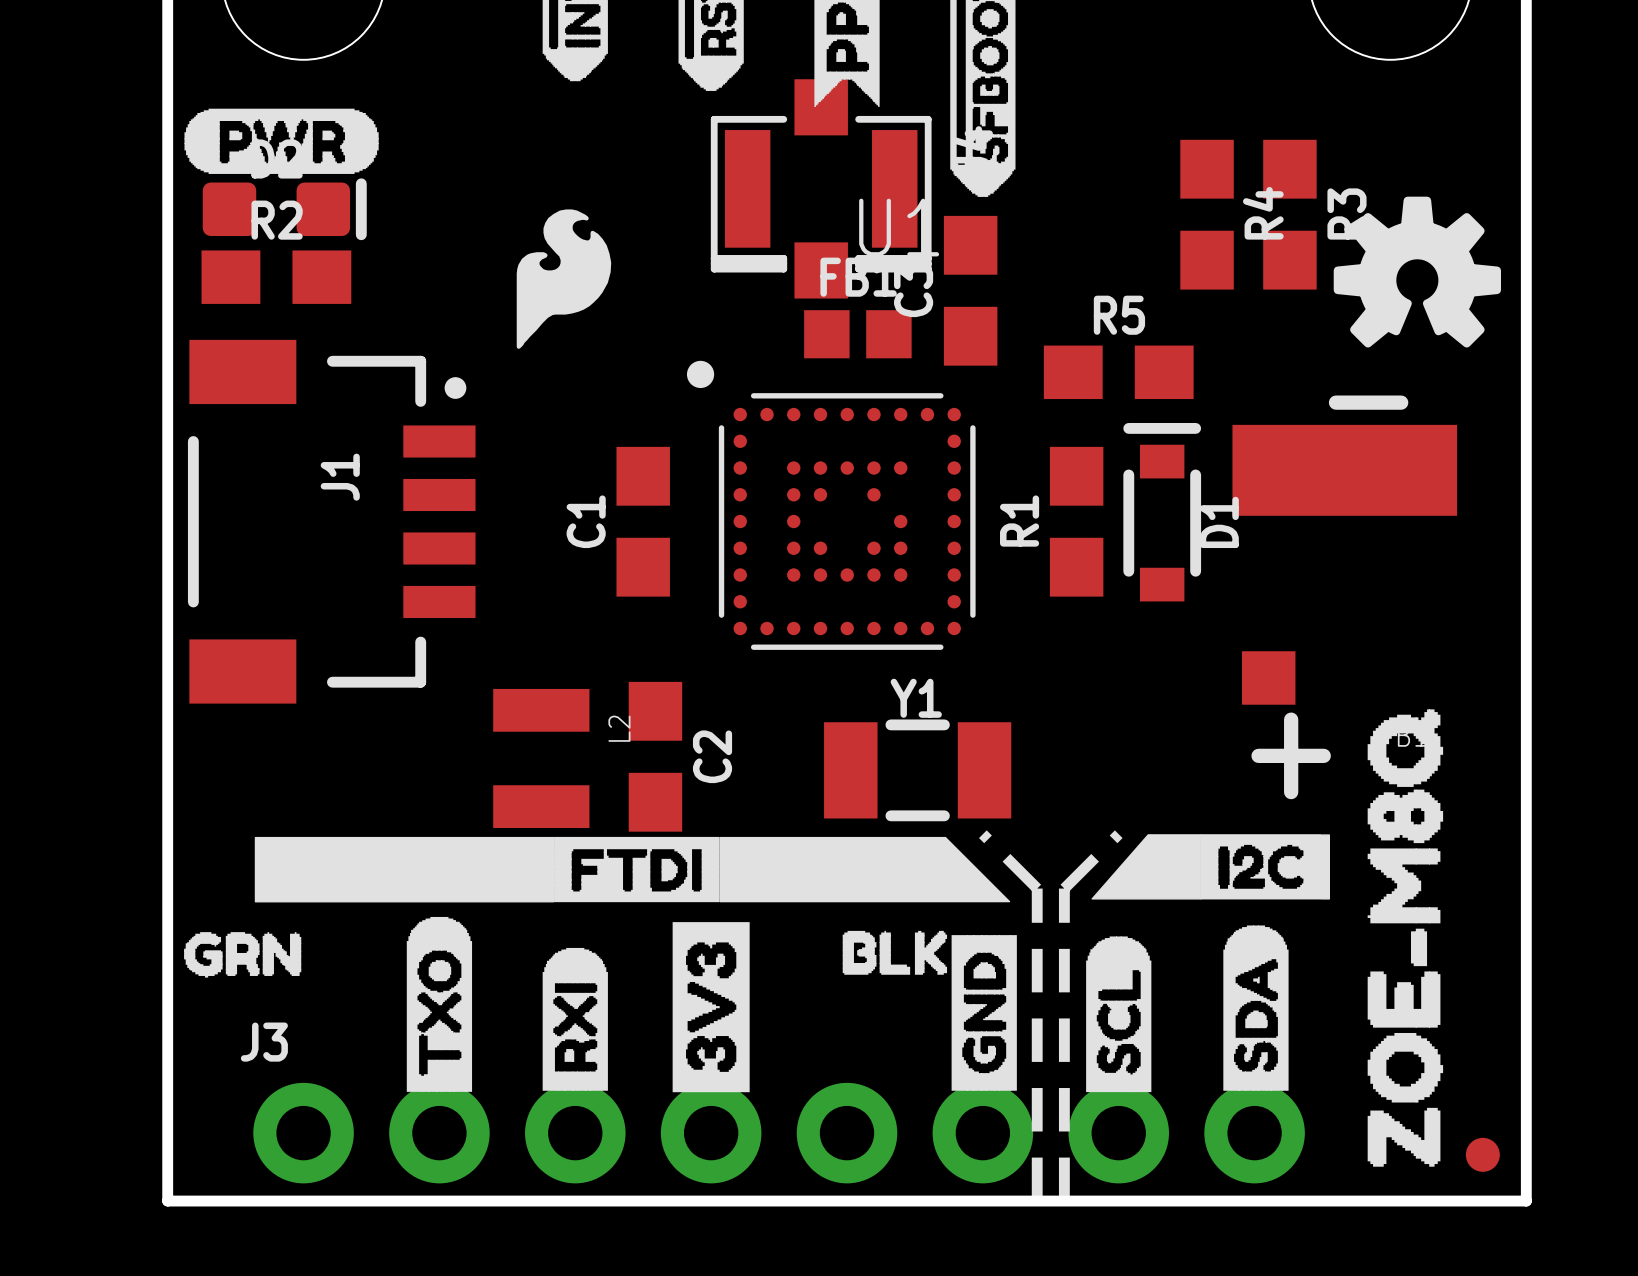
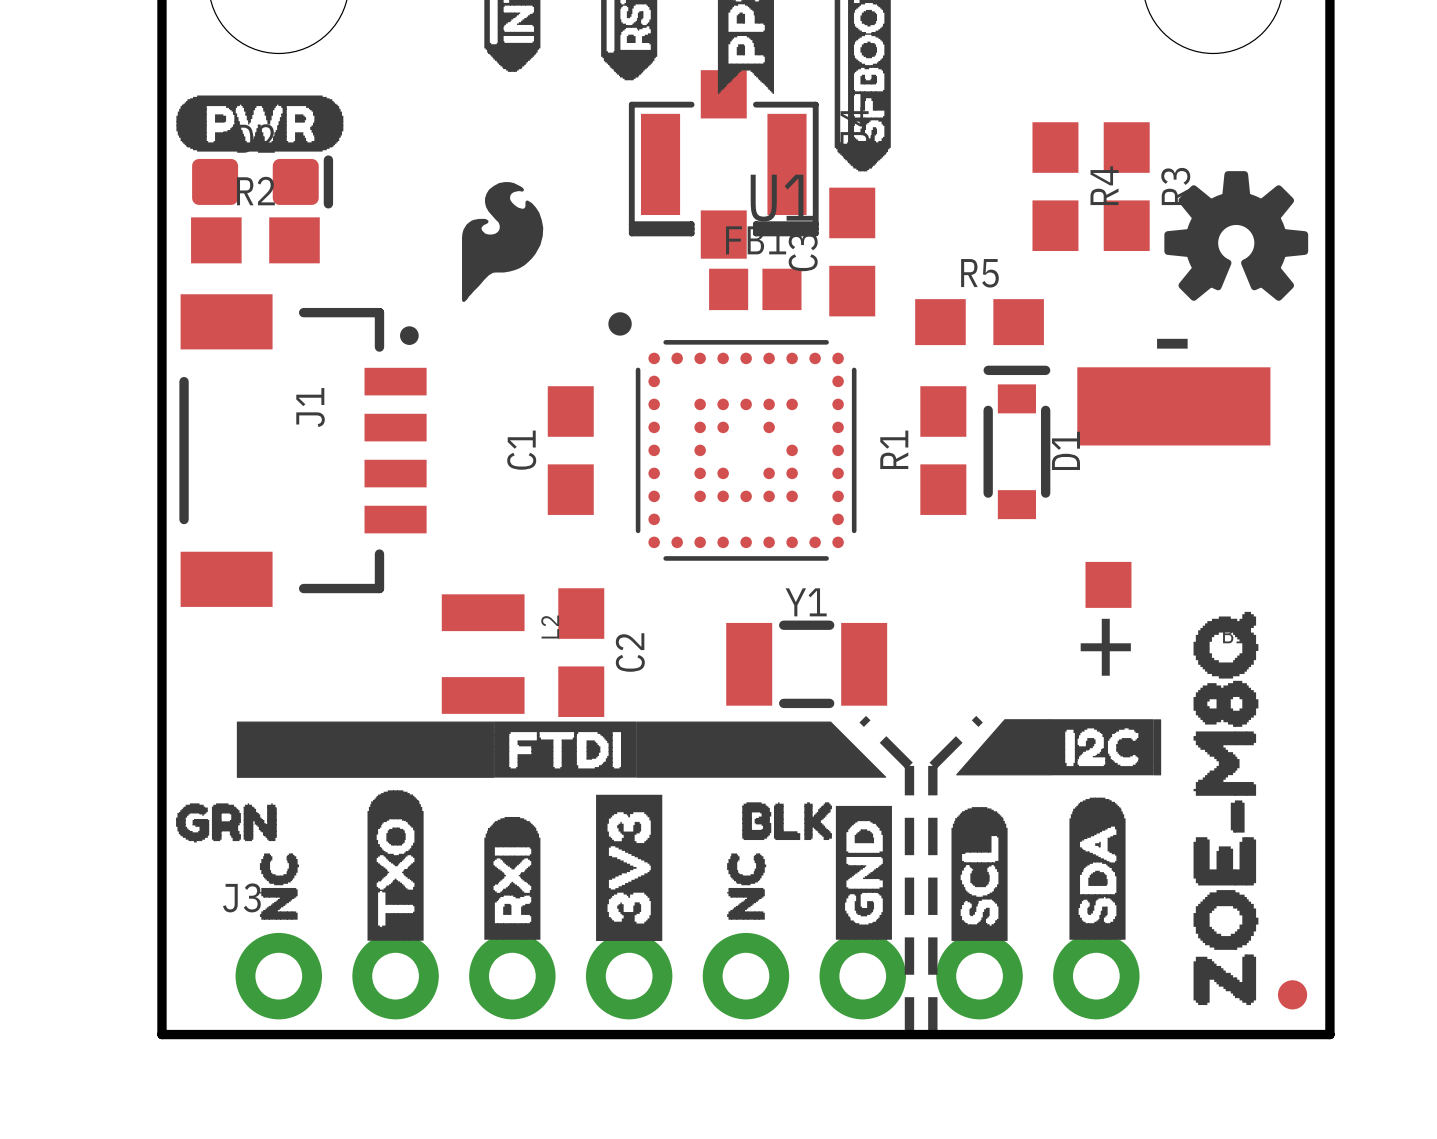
drawing: none -> [259, 853, 300, 920]
drawing: none -> [727, 853, 767, 920]

